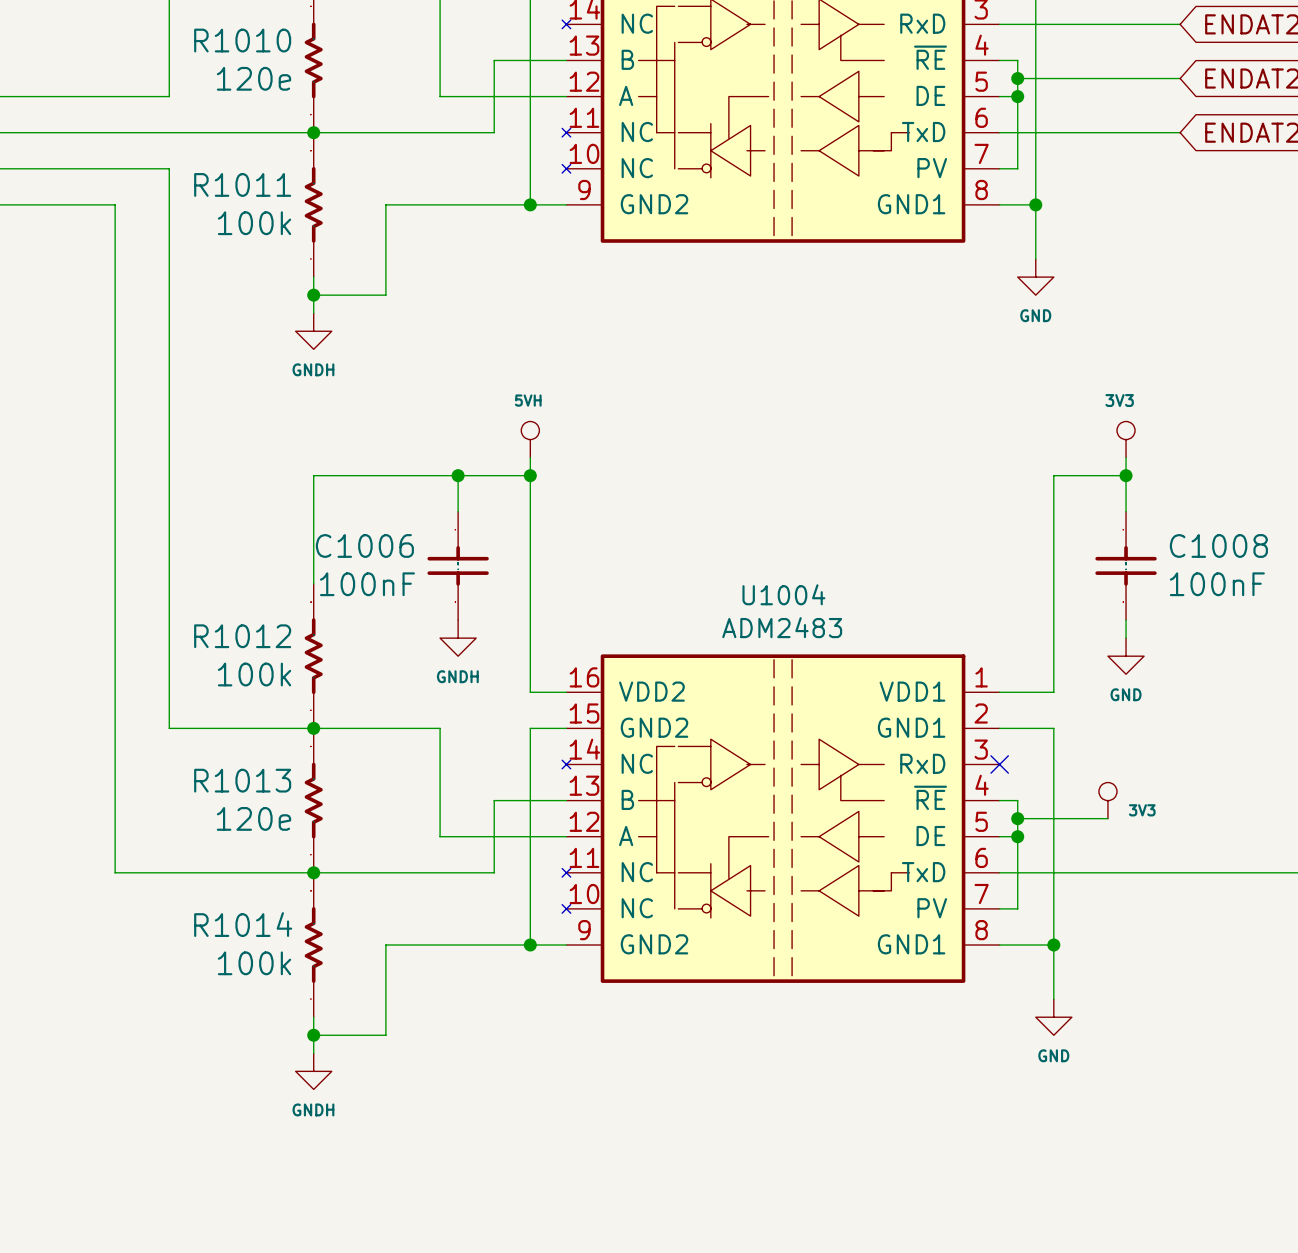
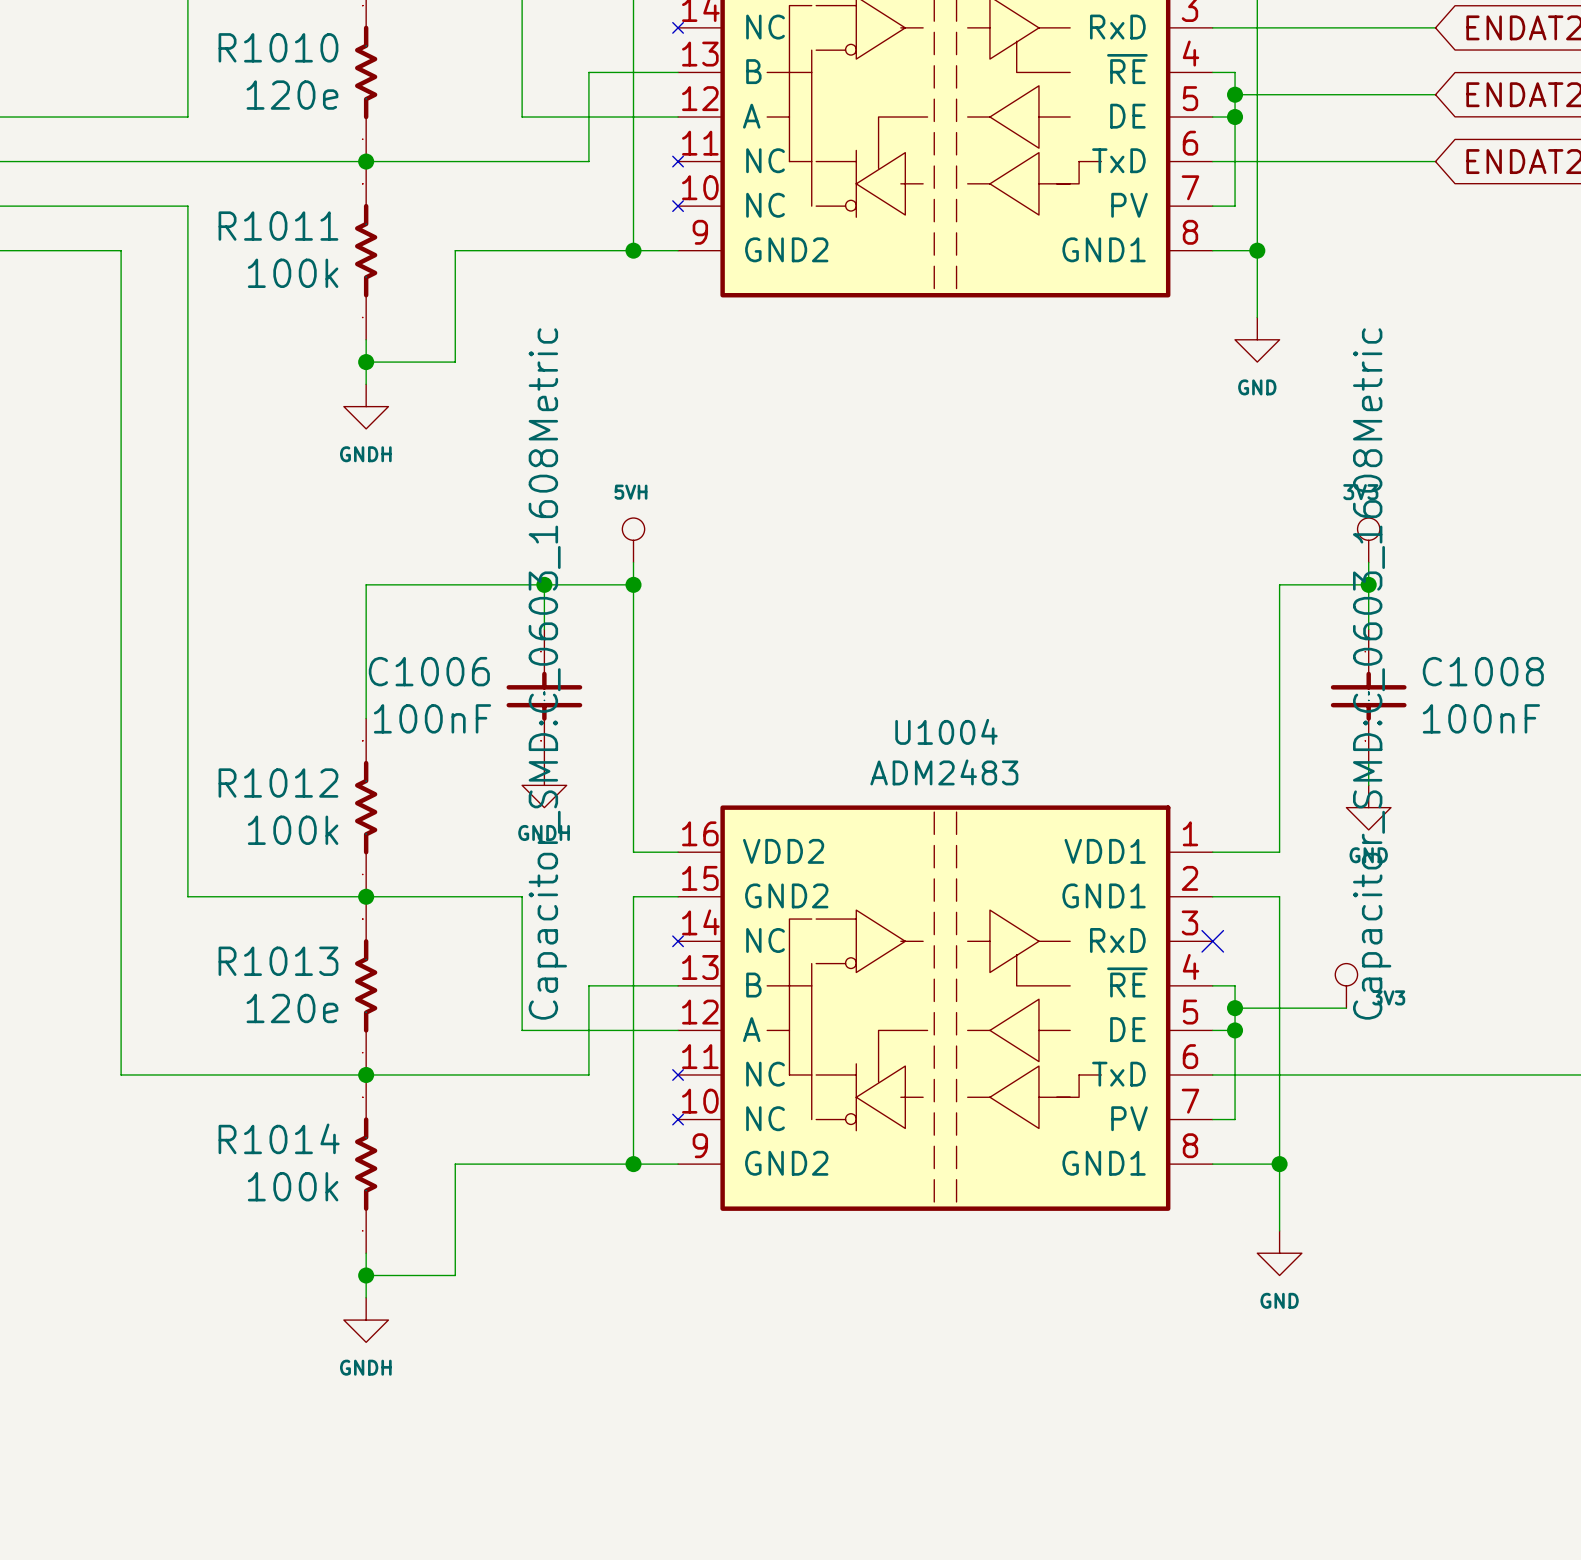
C1006 text: none -> Capacitor_SMD:C_0603_1608Metric (547, 673)
C1008 text: none -> Capacitor_SMD:C_0603_1608Metric (1372, 673)

